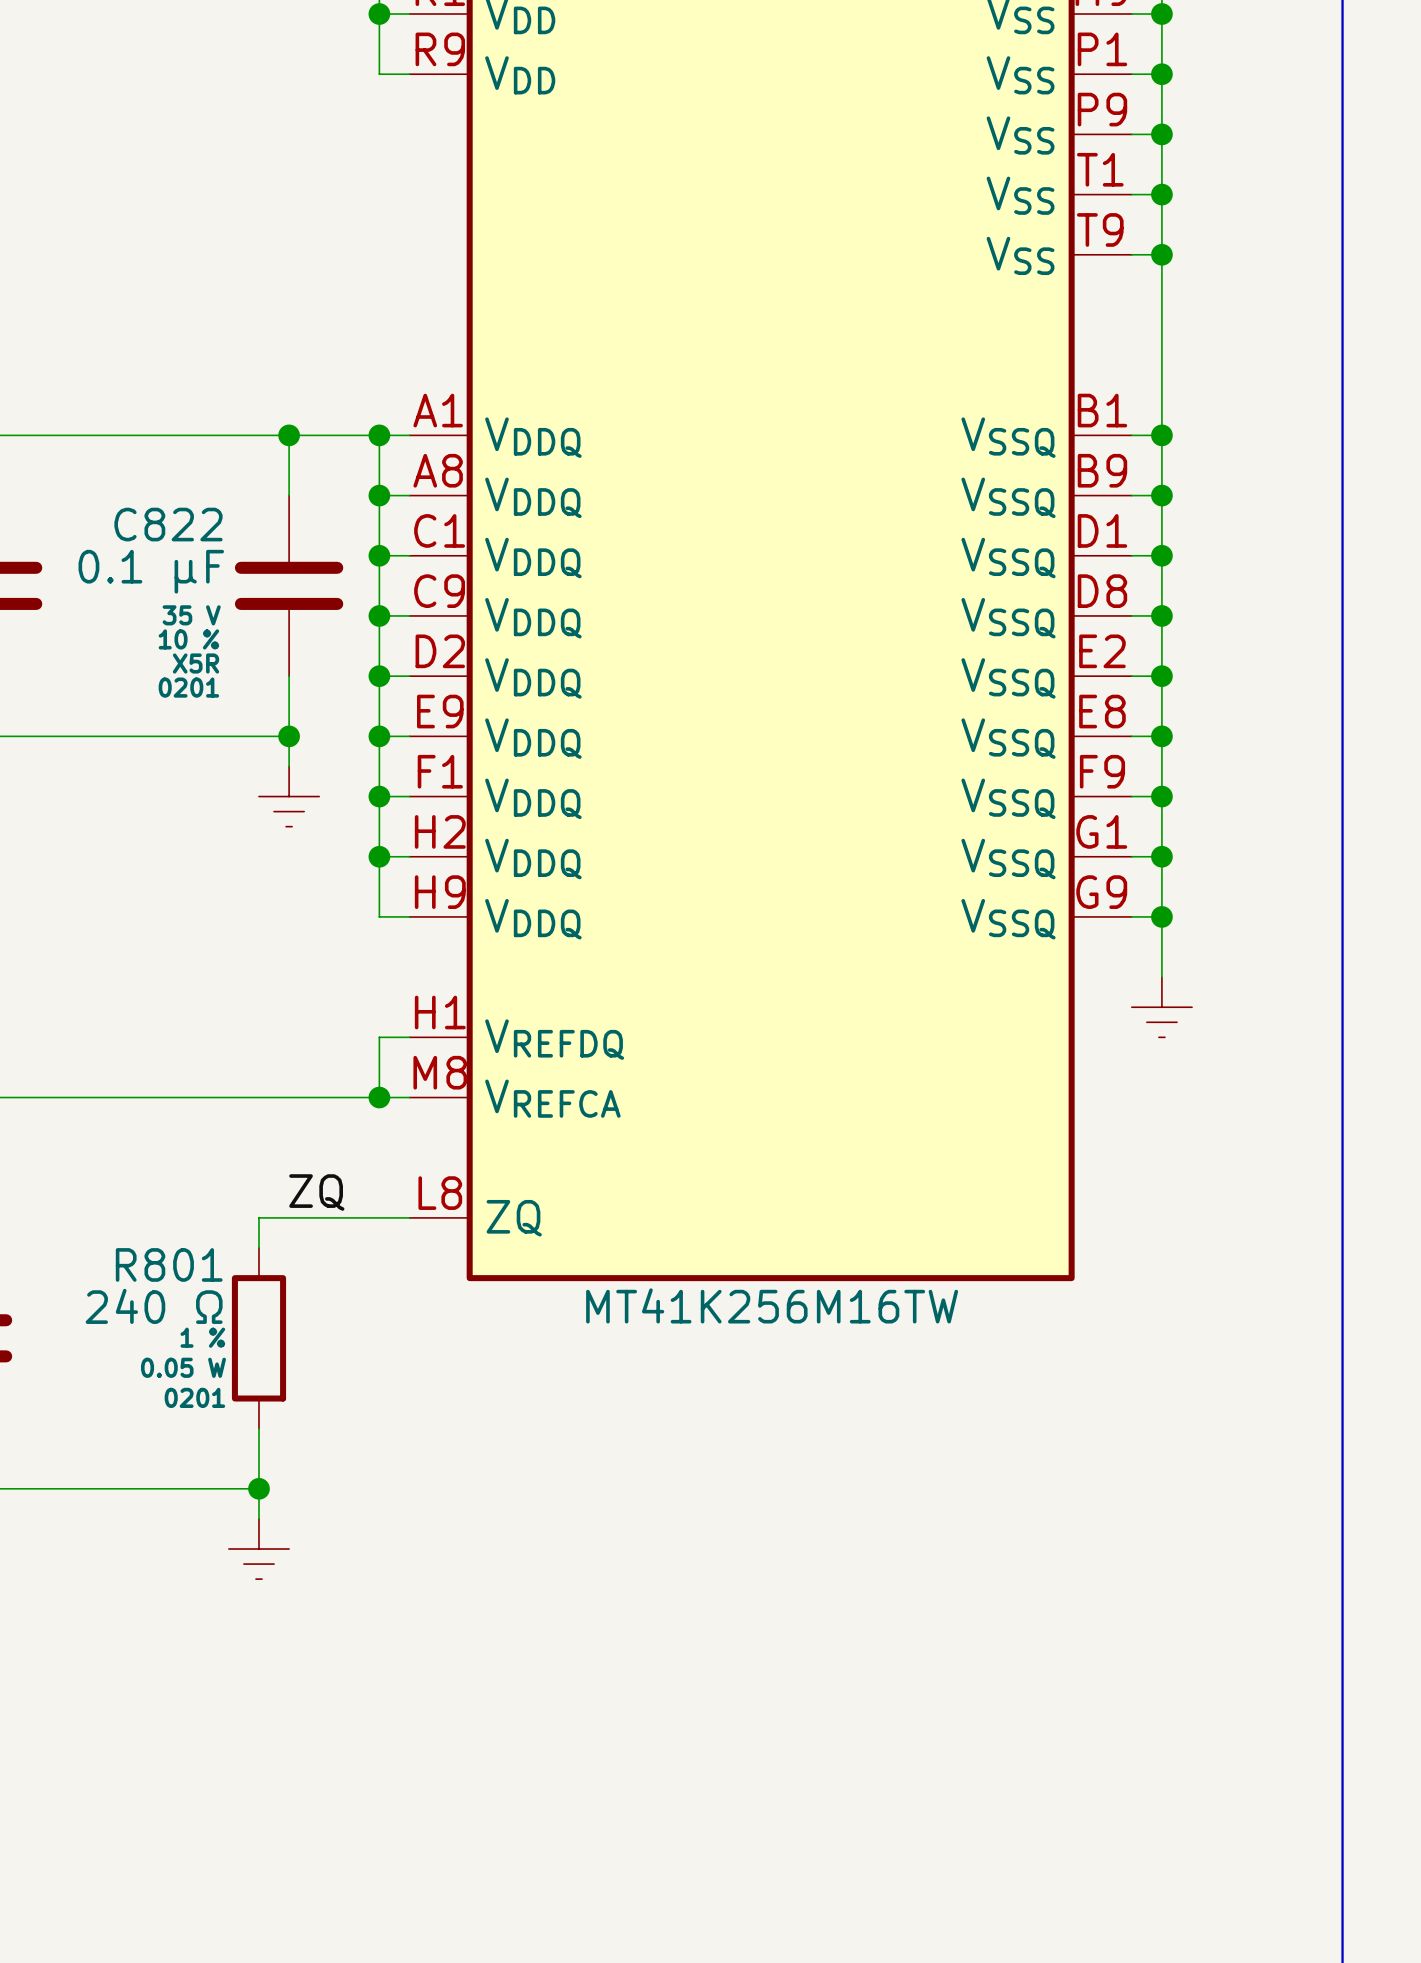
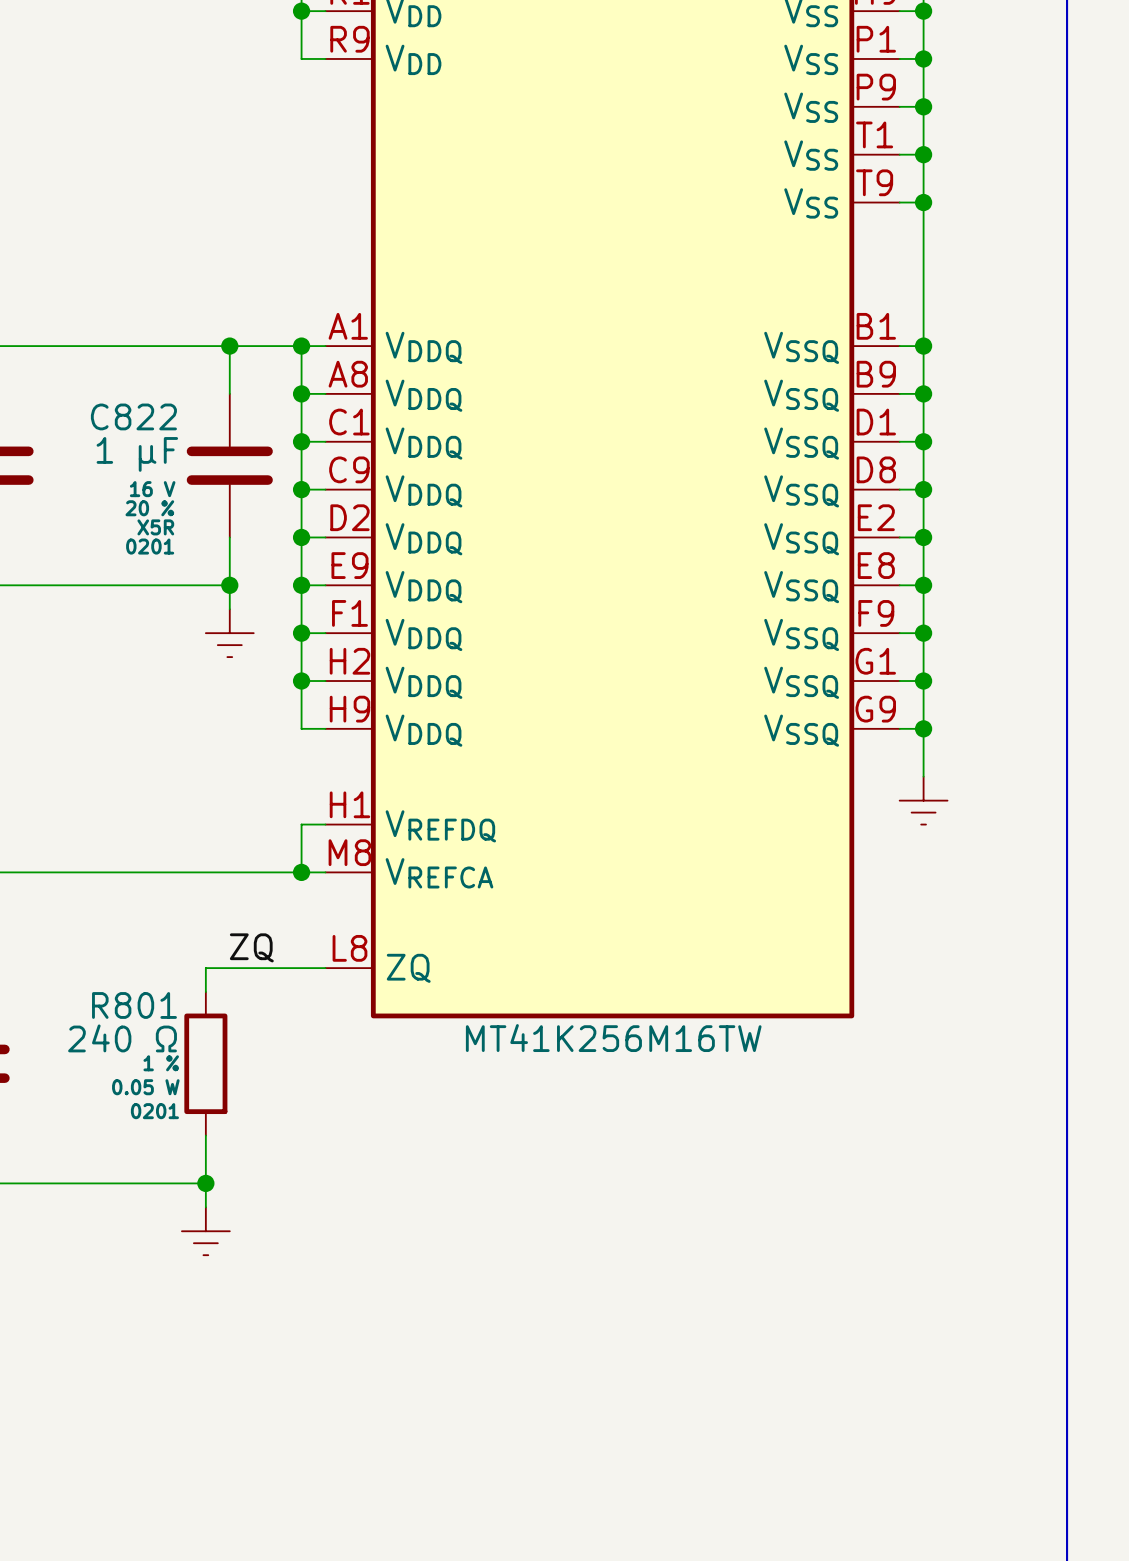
C822 value: 0.1 µF (151, 571) -> 1 µF (137, 454)
C822 text: 35 V (191, 615) -> 16 V (152, 489)
C822 text: 10 % (188, 639) -> 20 % (149, 508)

